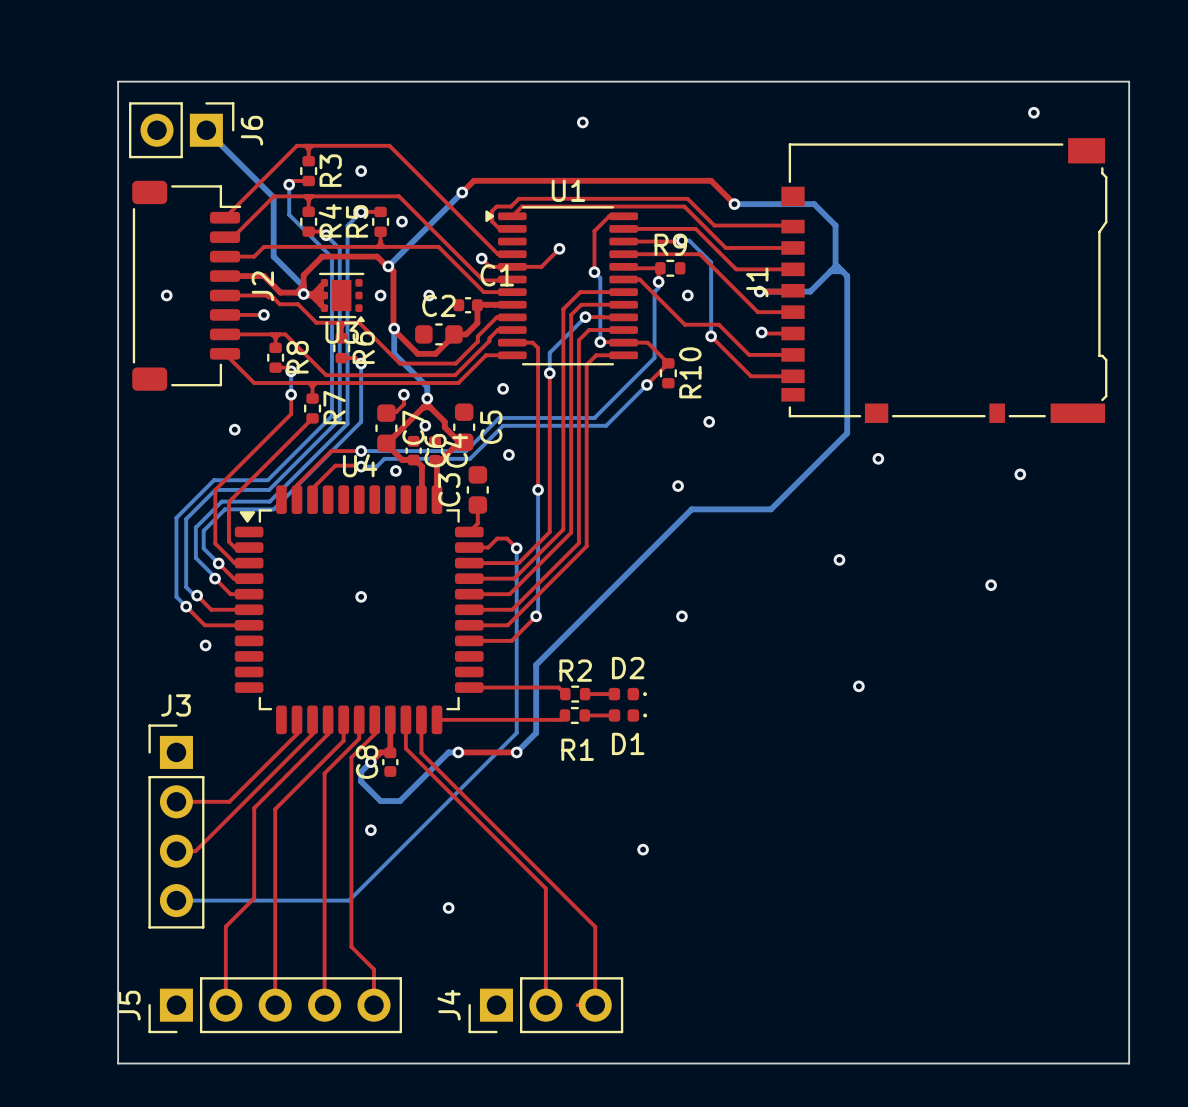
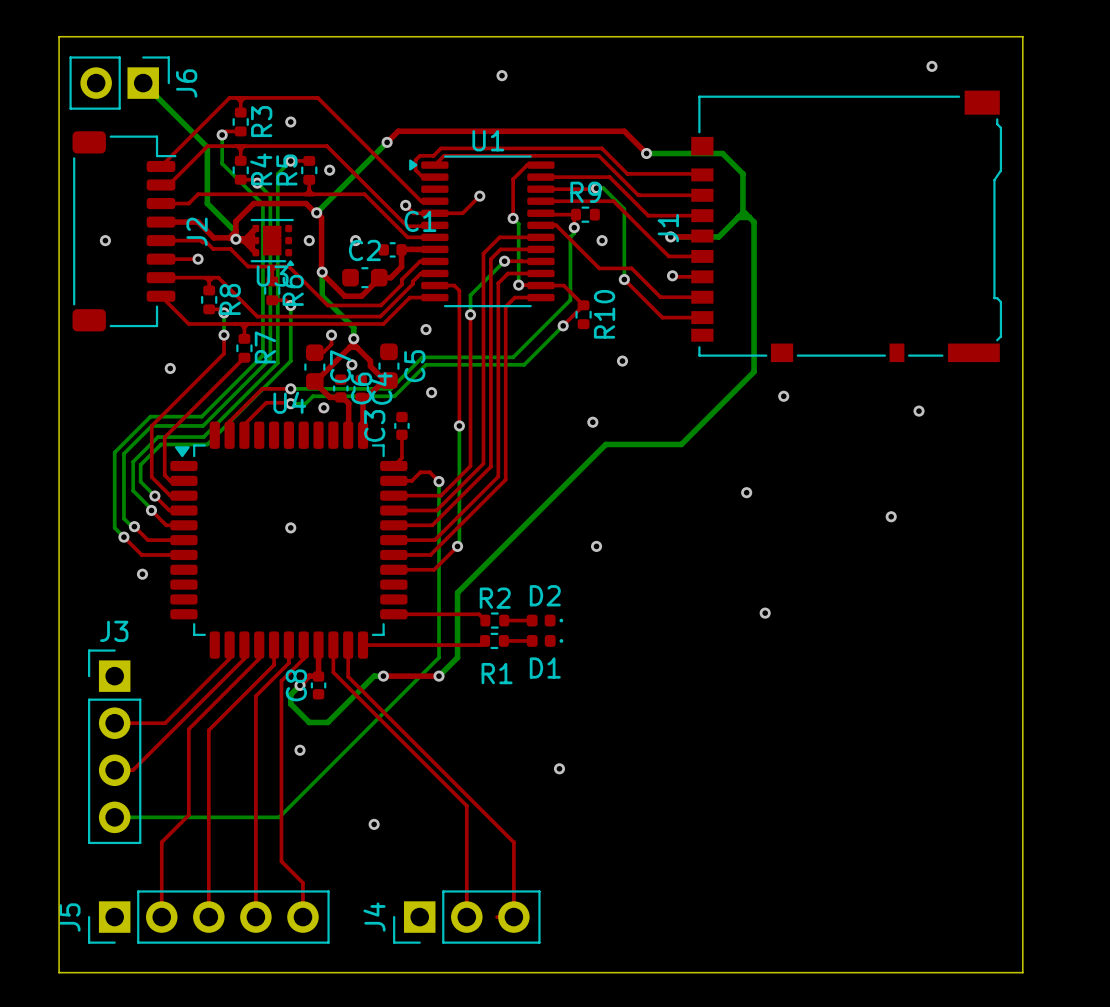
C3 footprint: [466, 466, 489, 514] -> [394, 411, 410, 441]

